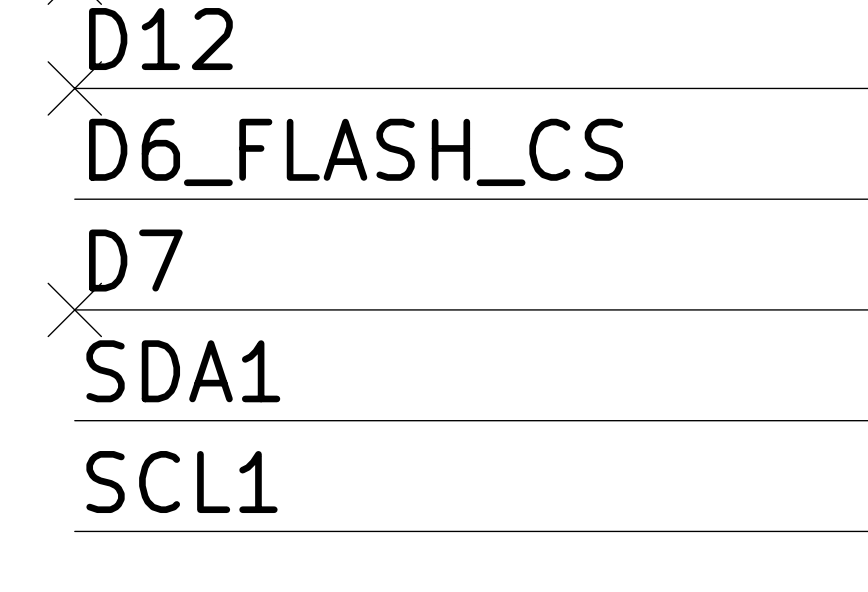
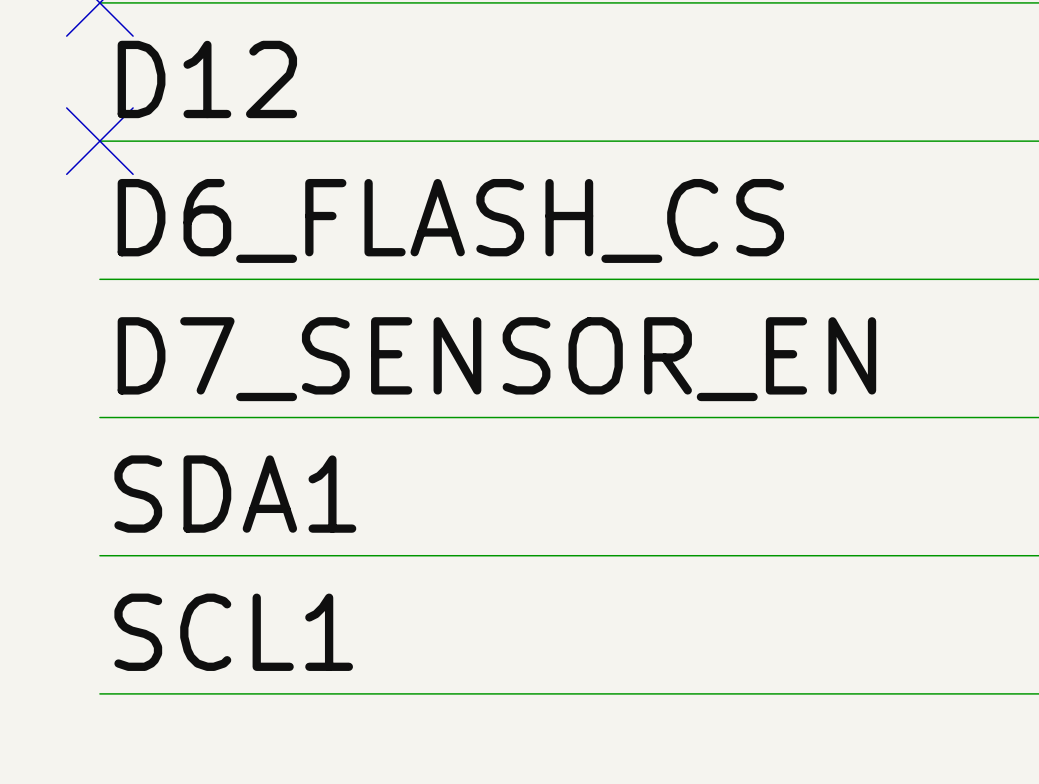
label: D7 (135, 260) -> D7_SENSOR_EN (496, 359)
no-connect mark: (74, 309) -> none

